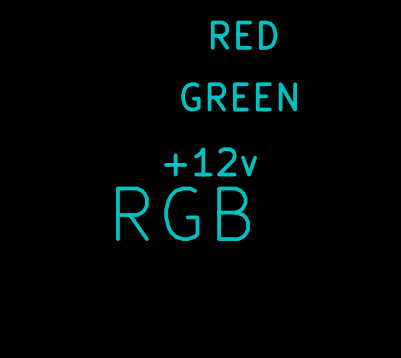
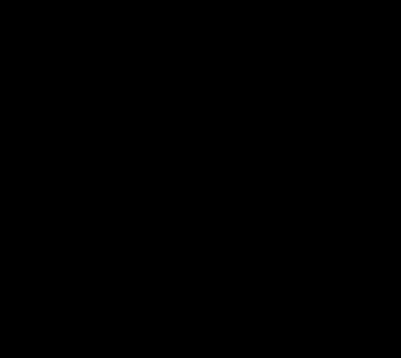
text: RED (244, 35) -> none
text: GREEN (239, 96) -> none
text: +12v (210, 161) -> none
text: RGB (182, 213) -> none

